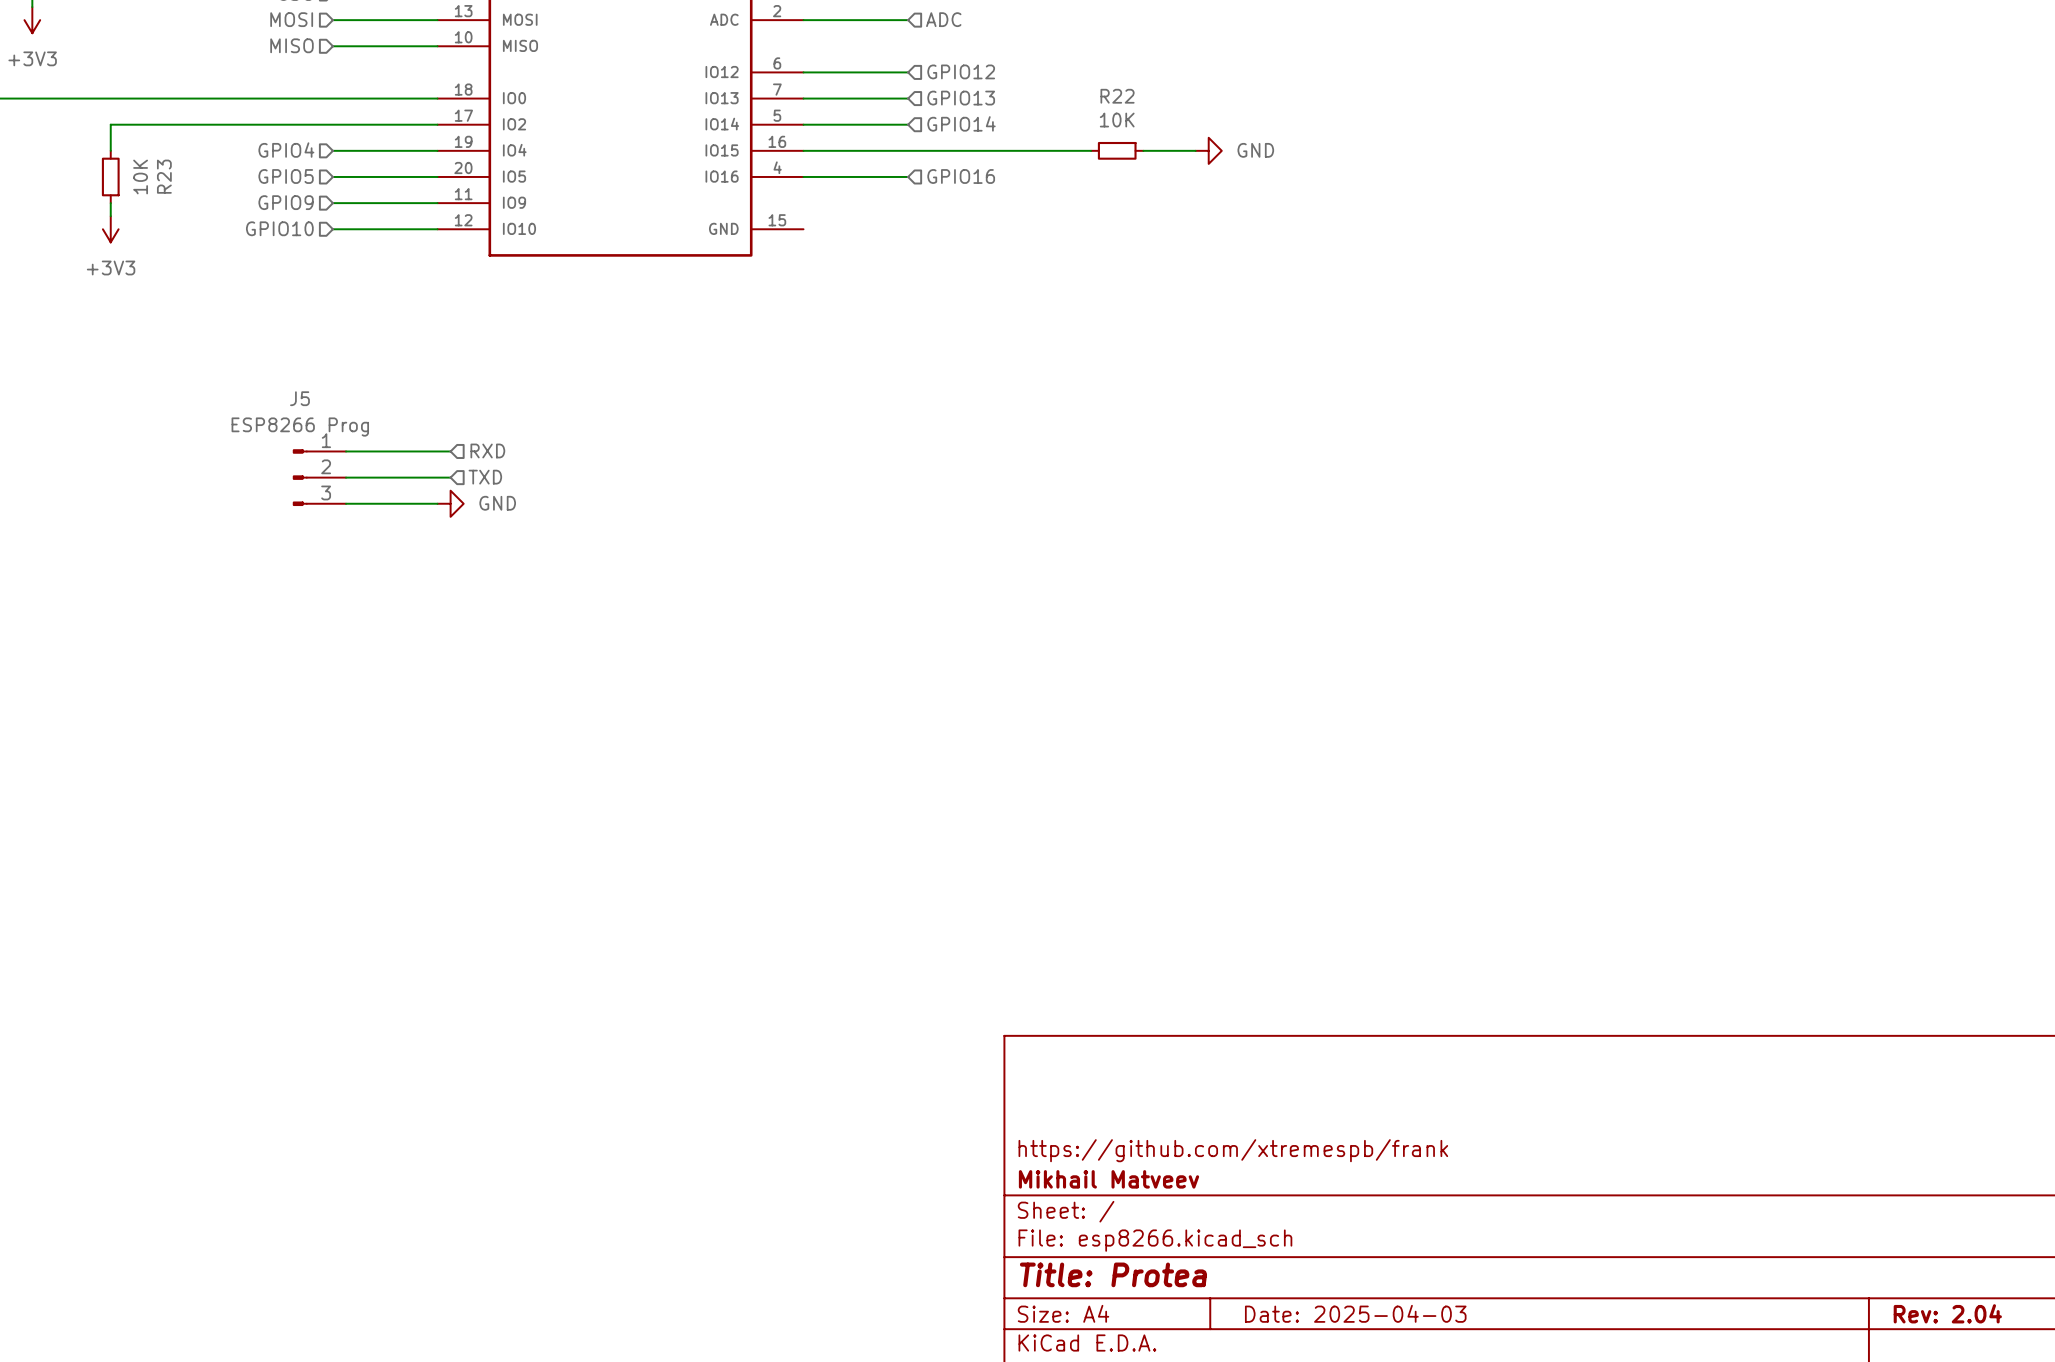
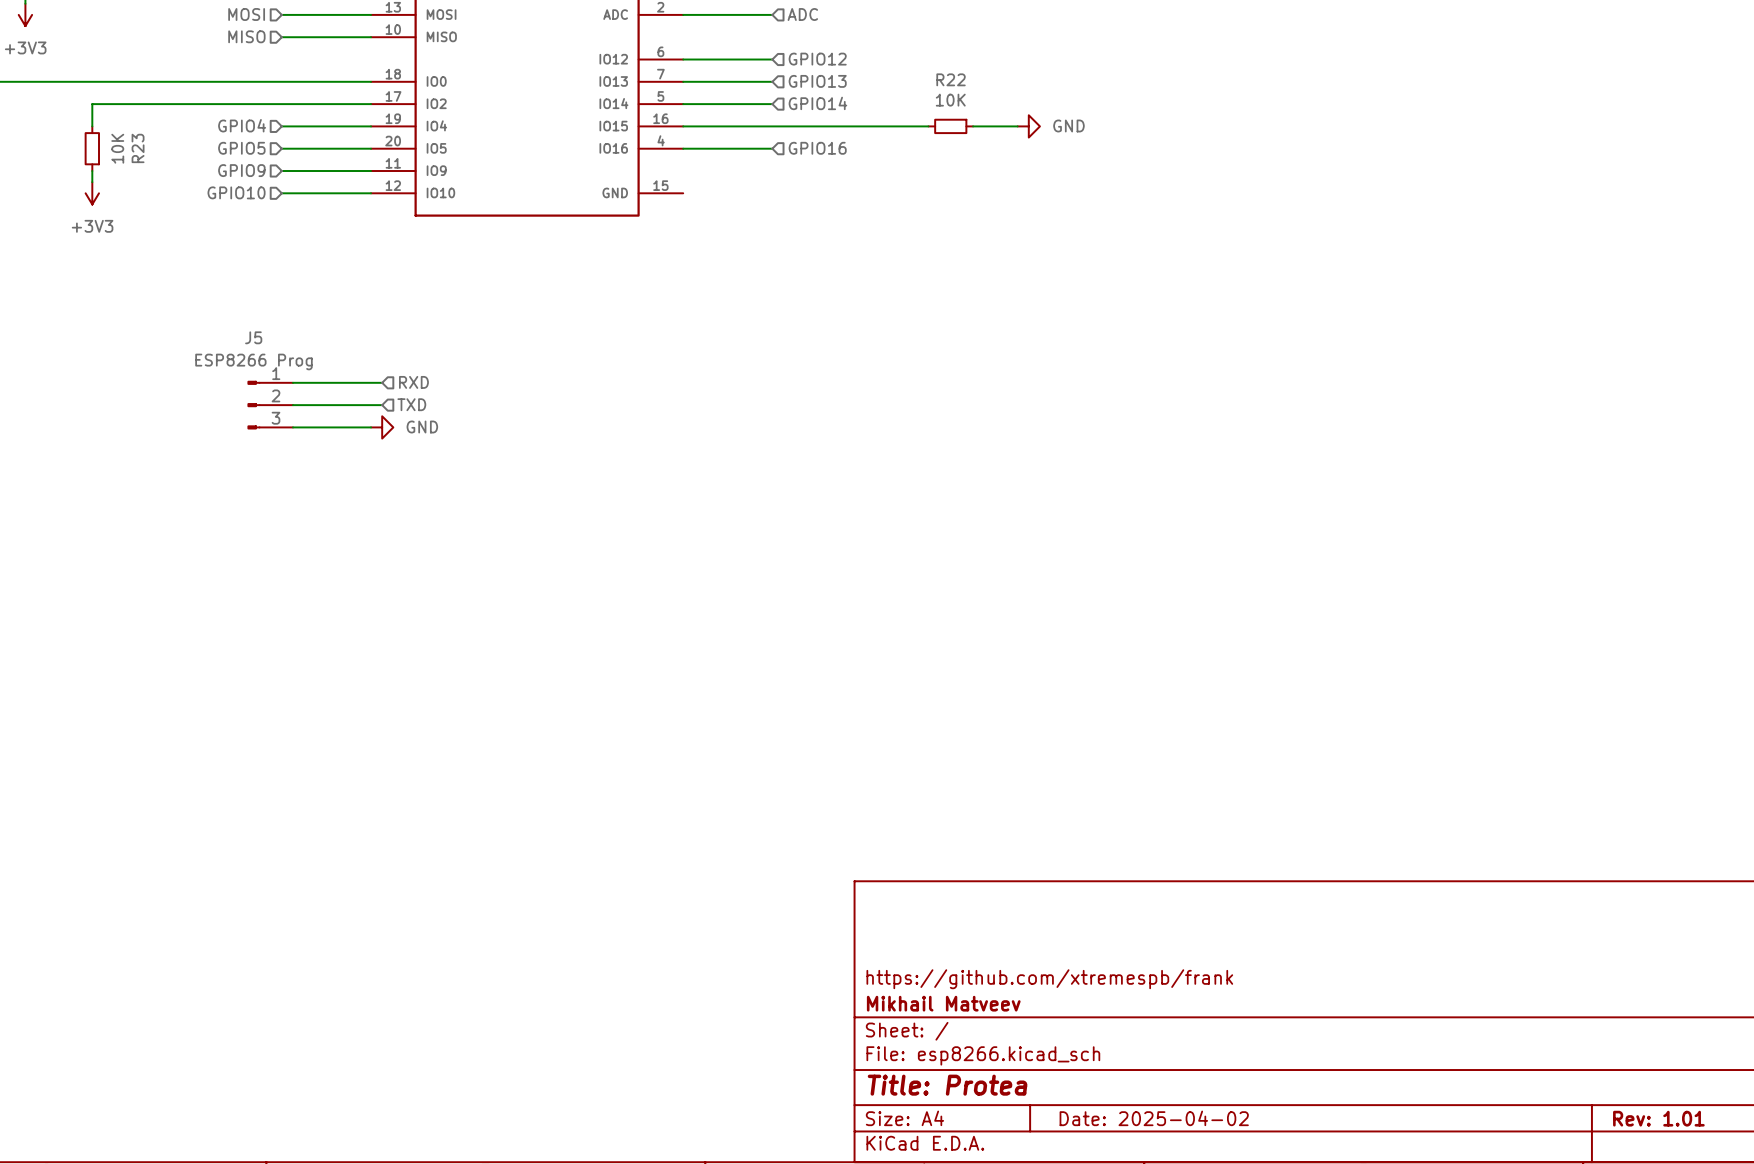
title block: Date: 2025-04-03 (1355, 1313) -> Date: 2025-04-02 (1154, 1118)
title block: Rev: 2.04 (1947, 1313) -> Rev: 1.01 (1658, 1118)

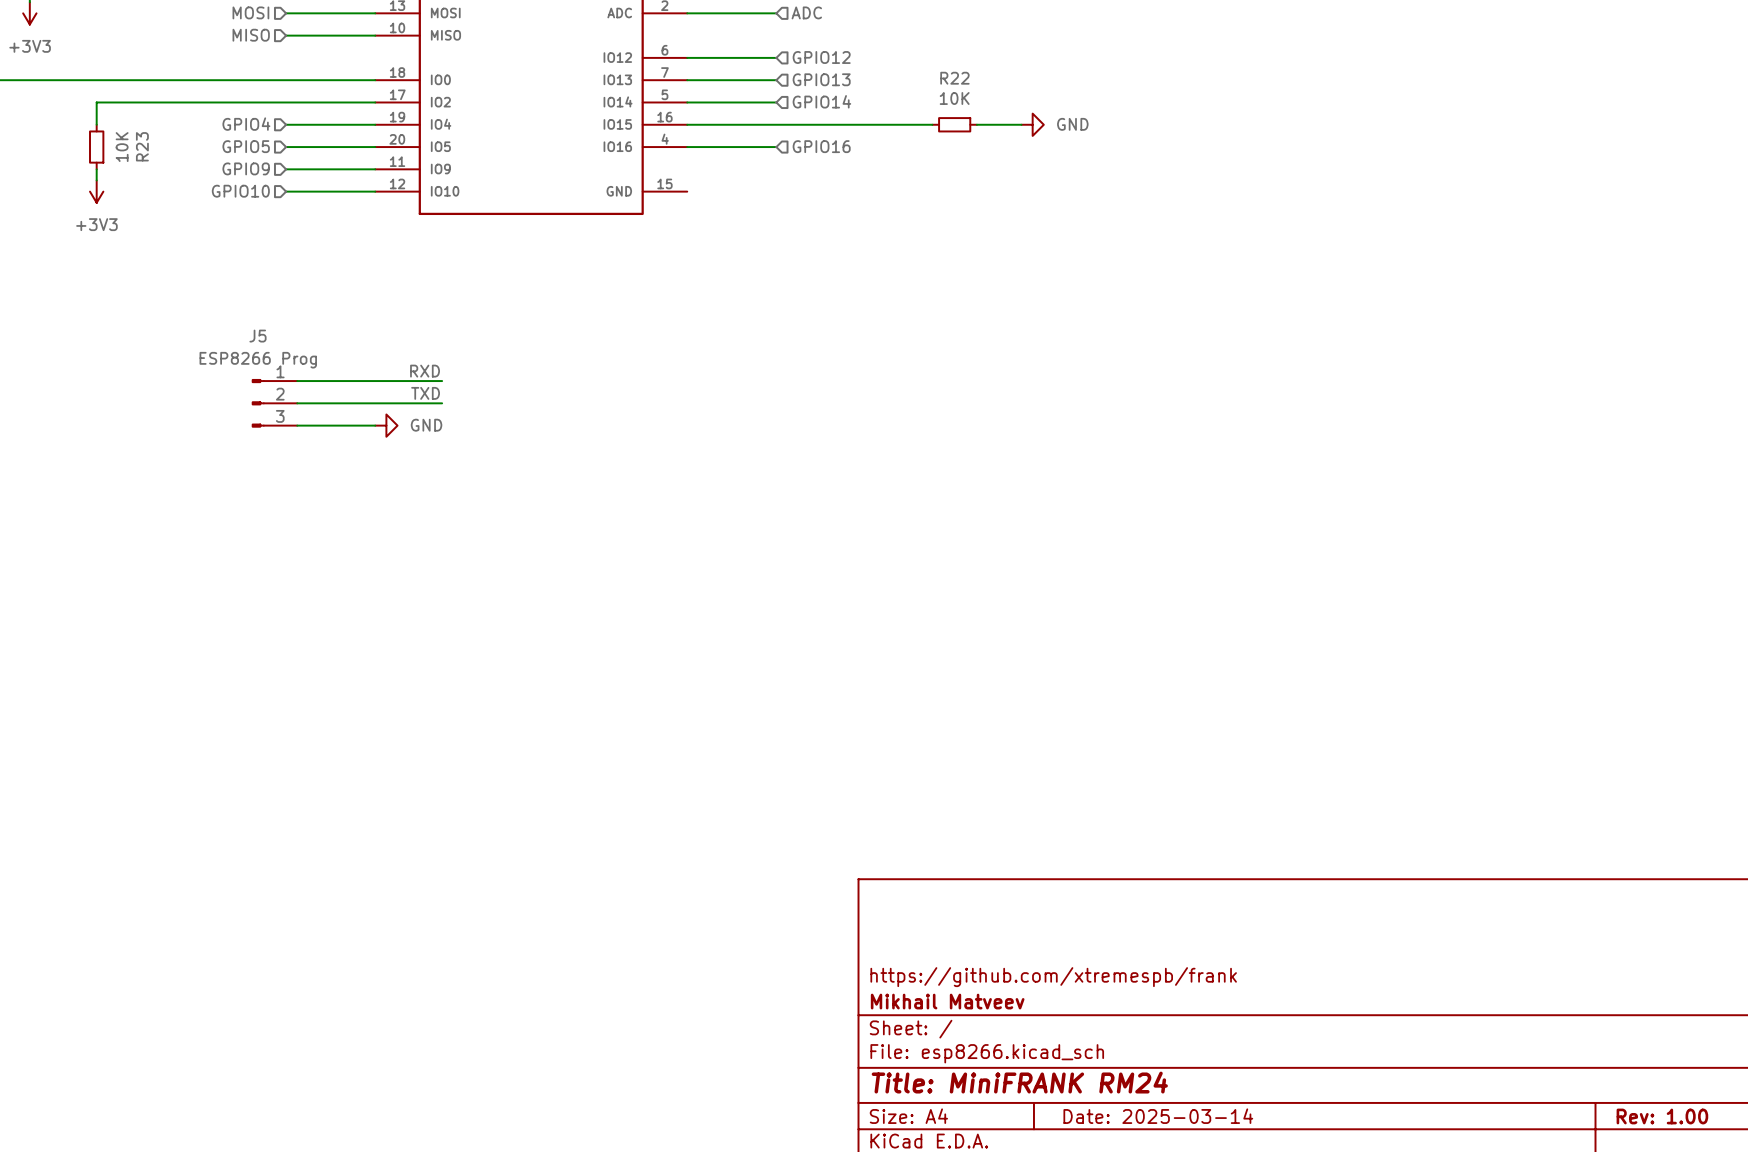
label: none -> RXD (425, 371)
wire: none -> (386, 381) (442, 381)
hierarchical label: RXD (413, 382) -> none
label: none -> TXD (425, 393)
hierarchical label: TXD (411, 404) -> none
wire: none -> (386, 403) (442, 403)
title block: Title: Protea (947, 1085) -> Title: MiniFRANK RM24 (1019, 1082)
title block: Date: 2025-04-02 (1154, 1118) -> Date: 2025-03-14 (1158, 1116)
title block: Rev: 1.01 (1658, 1118) -> Rev: 1.00 (1662, 1116)

